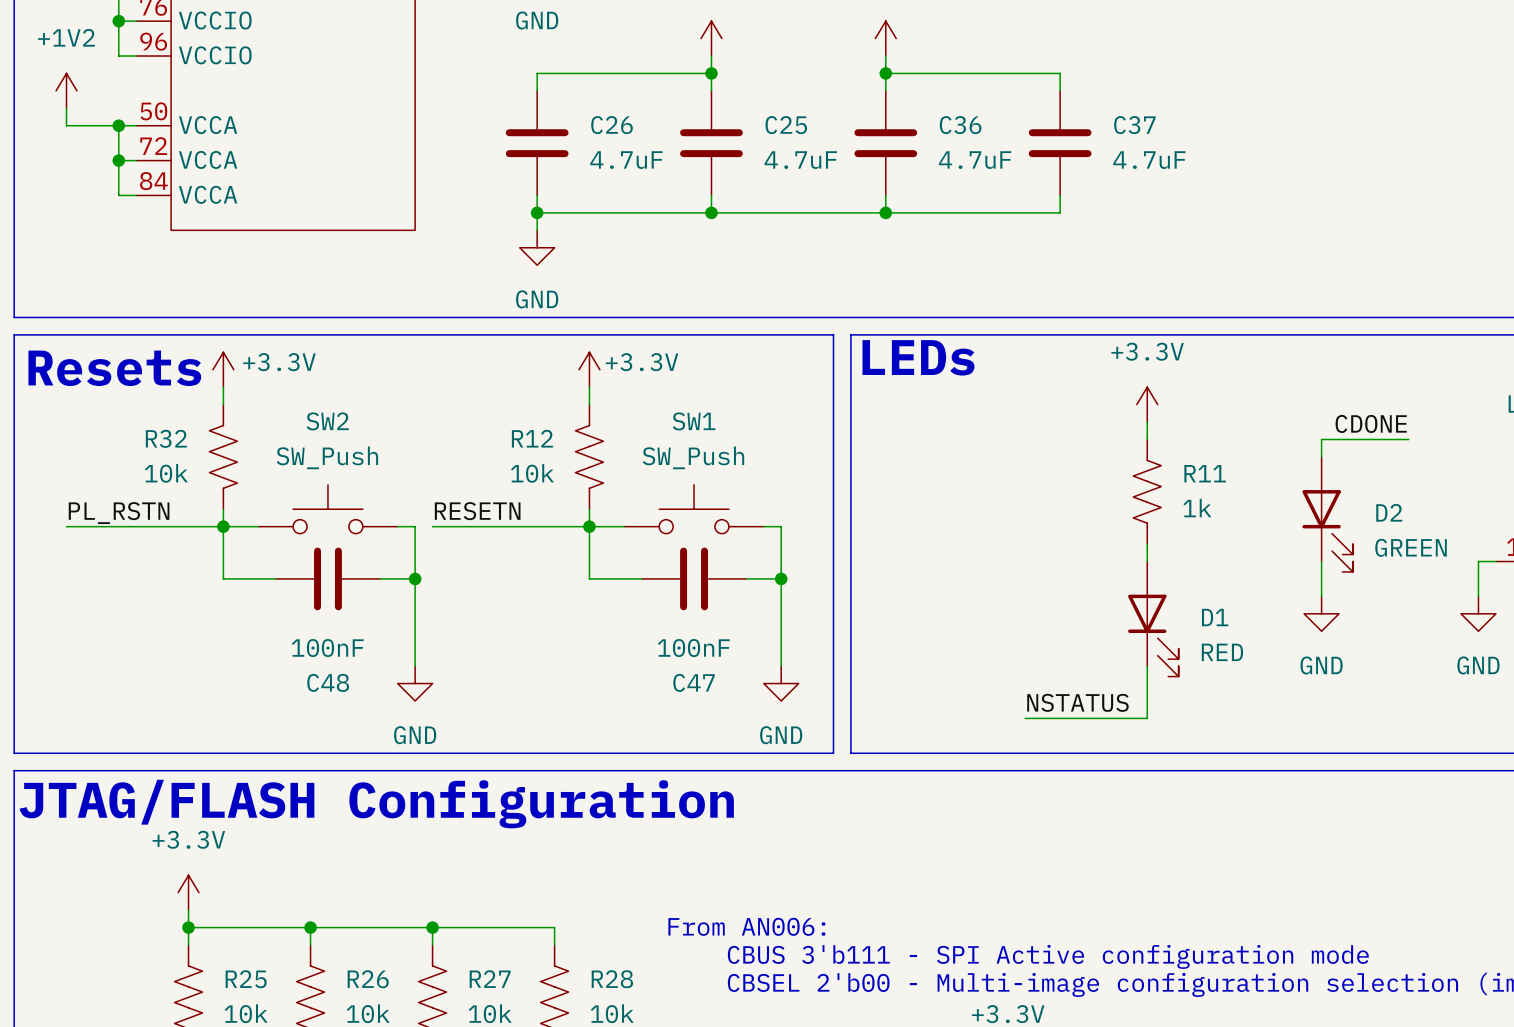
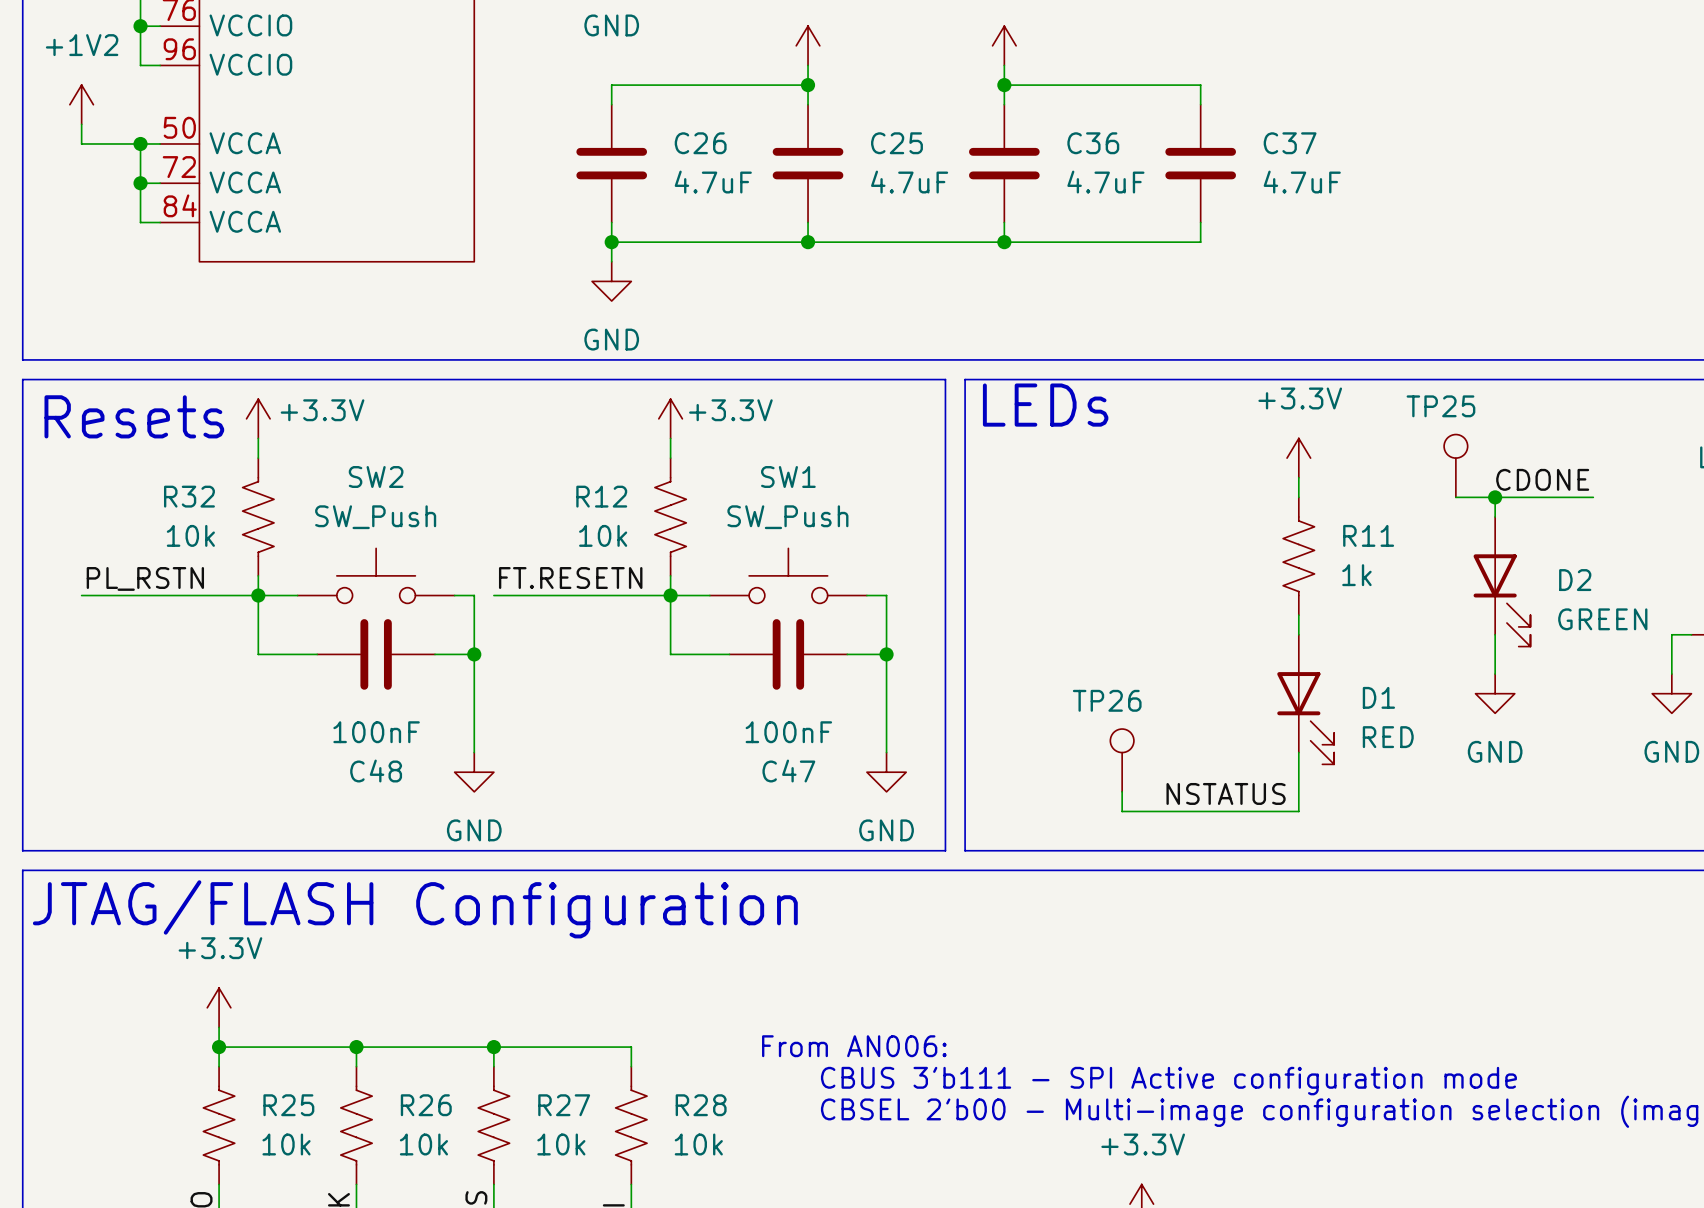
TP25: none -> (1455, 465)
wire: none -> (1455, 497) (1495, 497)
junction: none -> (1495, 497)
label: RESETN (477, 511) -> FT.RESETN (570, 578)
TP26: none -> (1122, 760)
wire: none -> (1122, 791) (1122, 811) (1161, 811)

